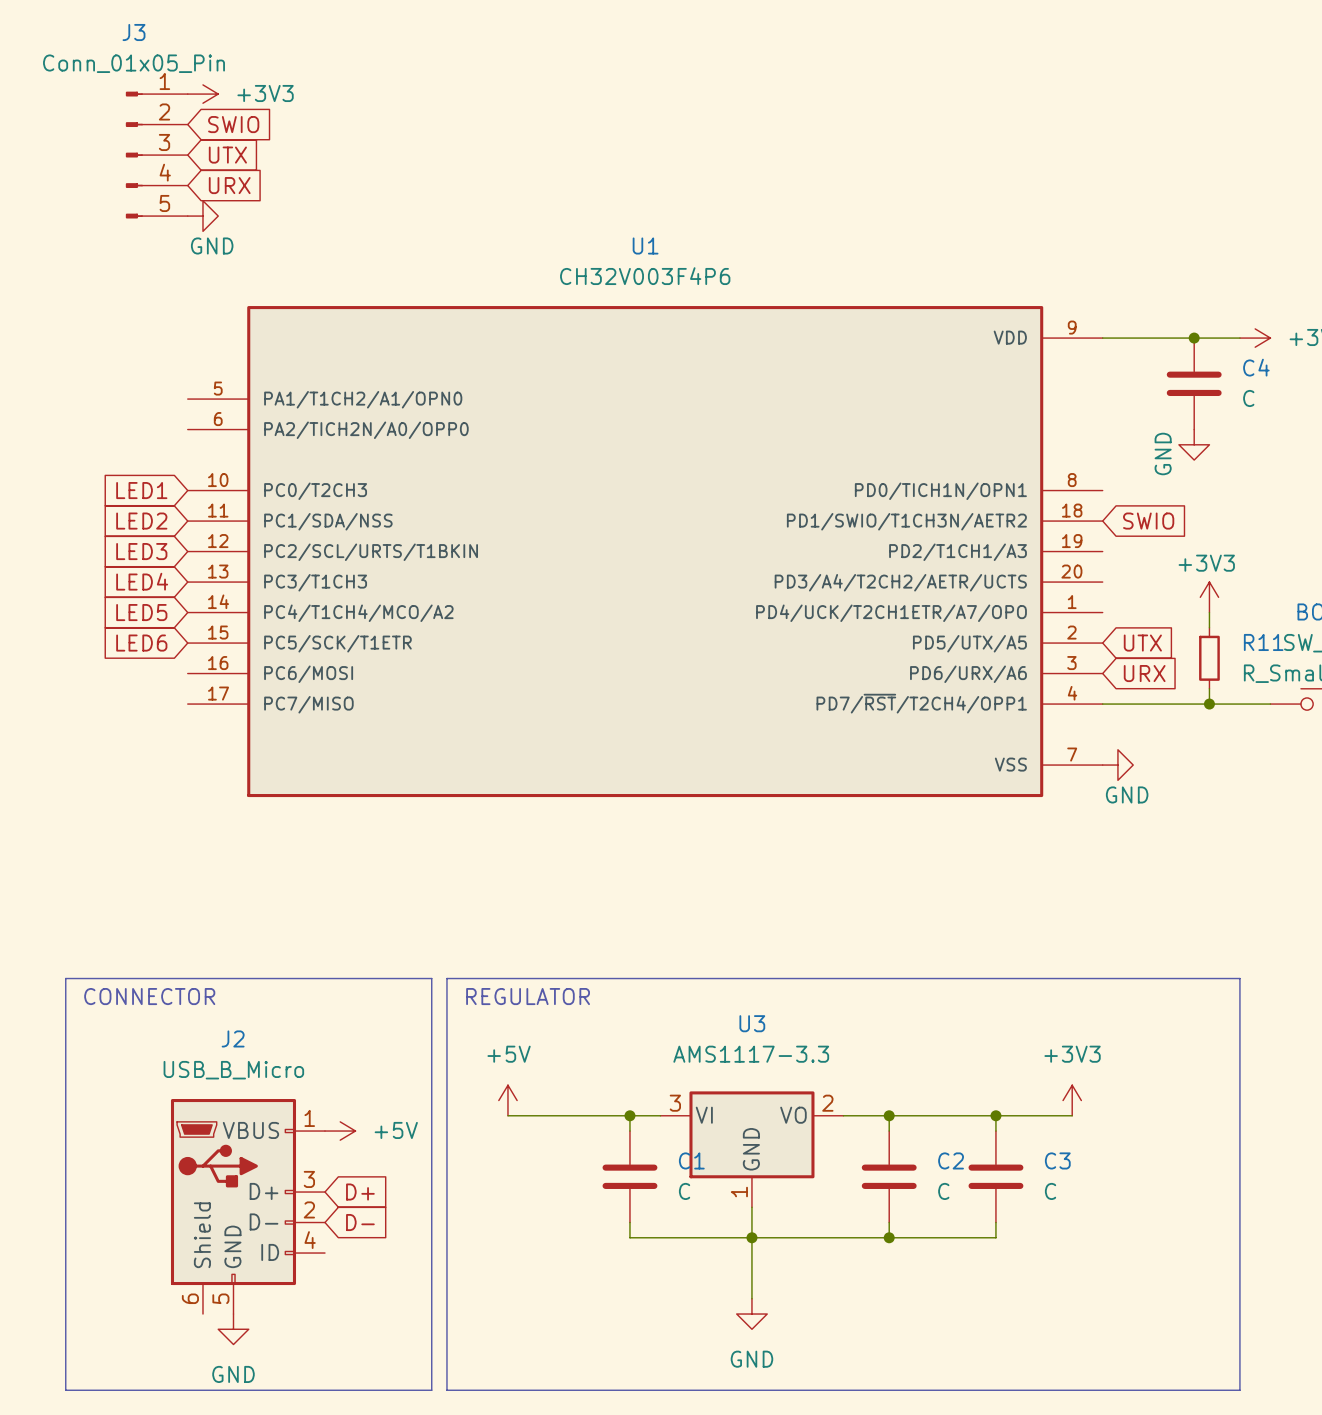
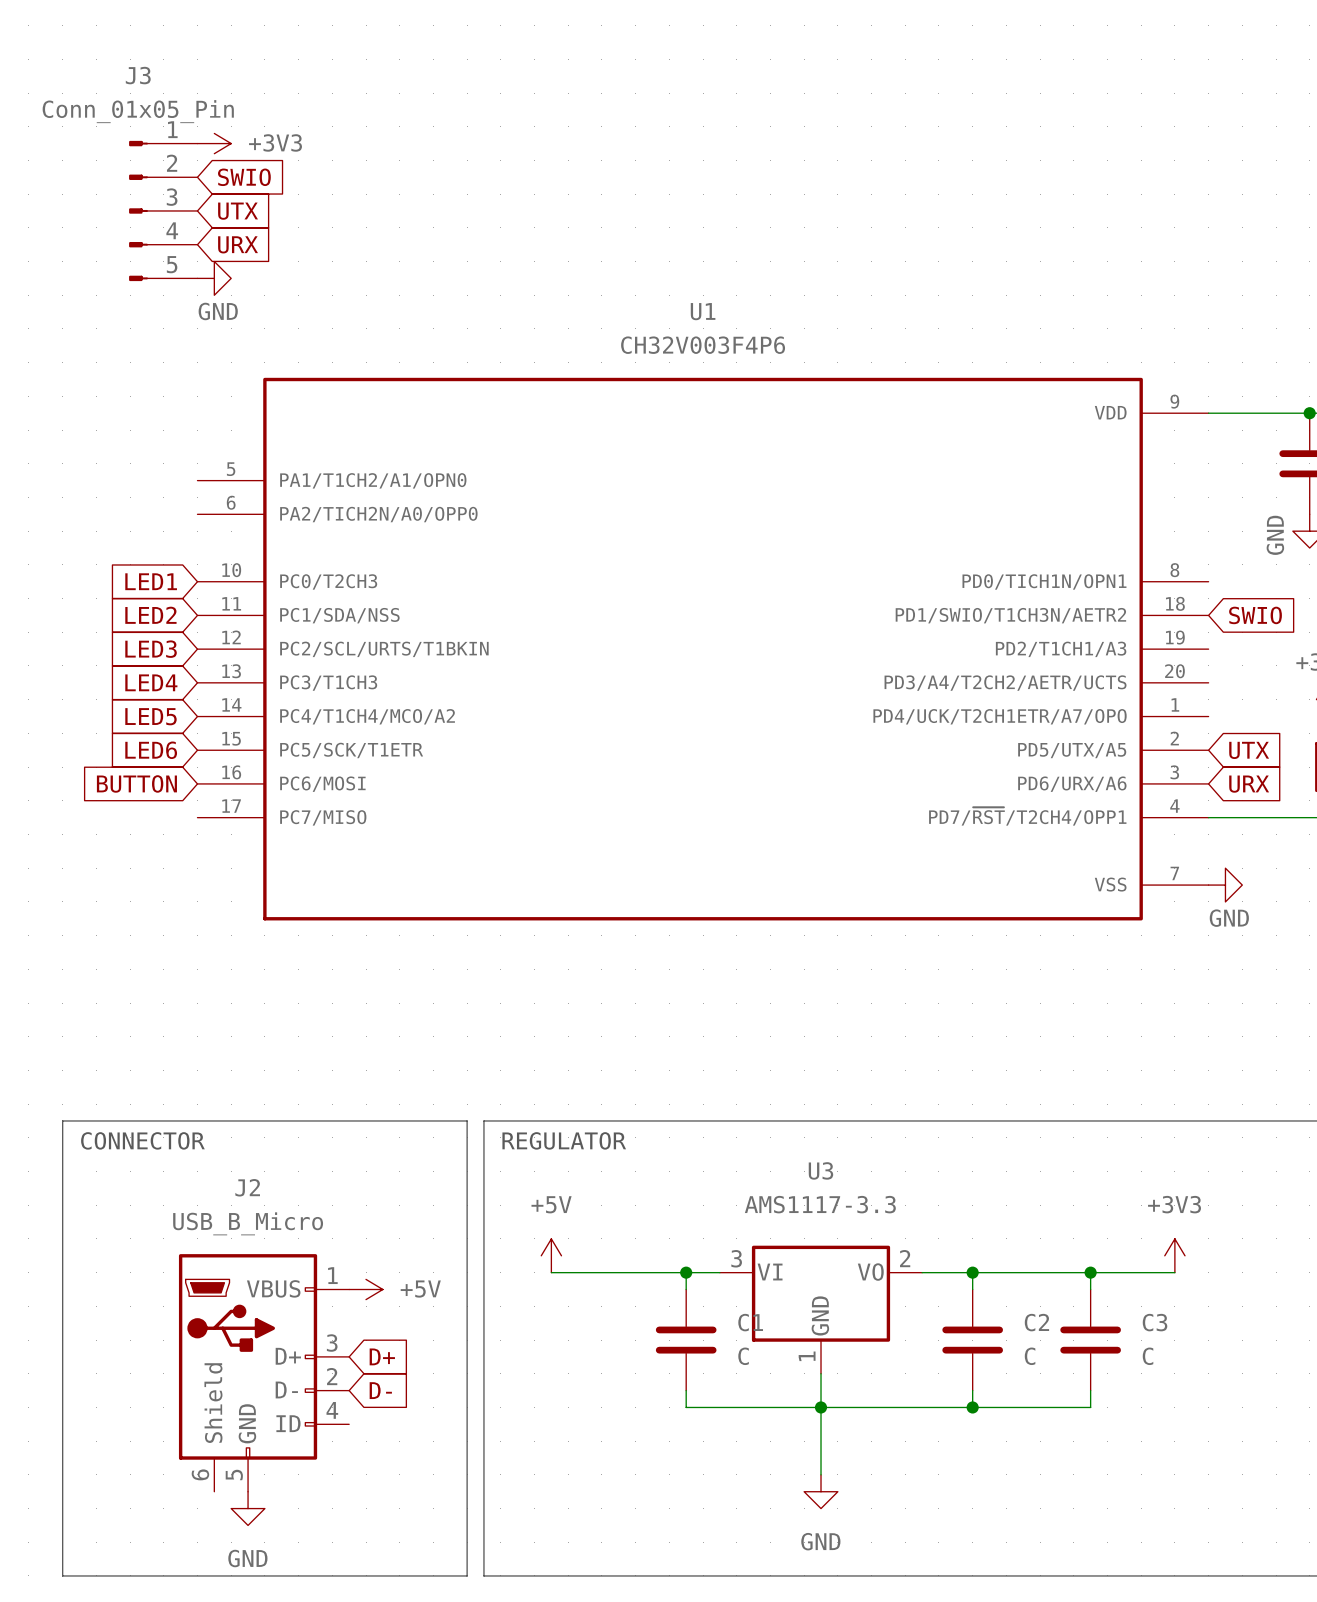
global label: none -> BUTTON (136, 783)

